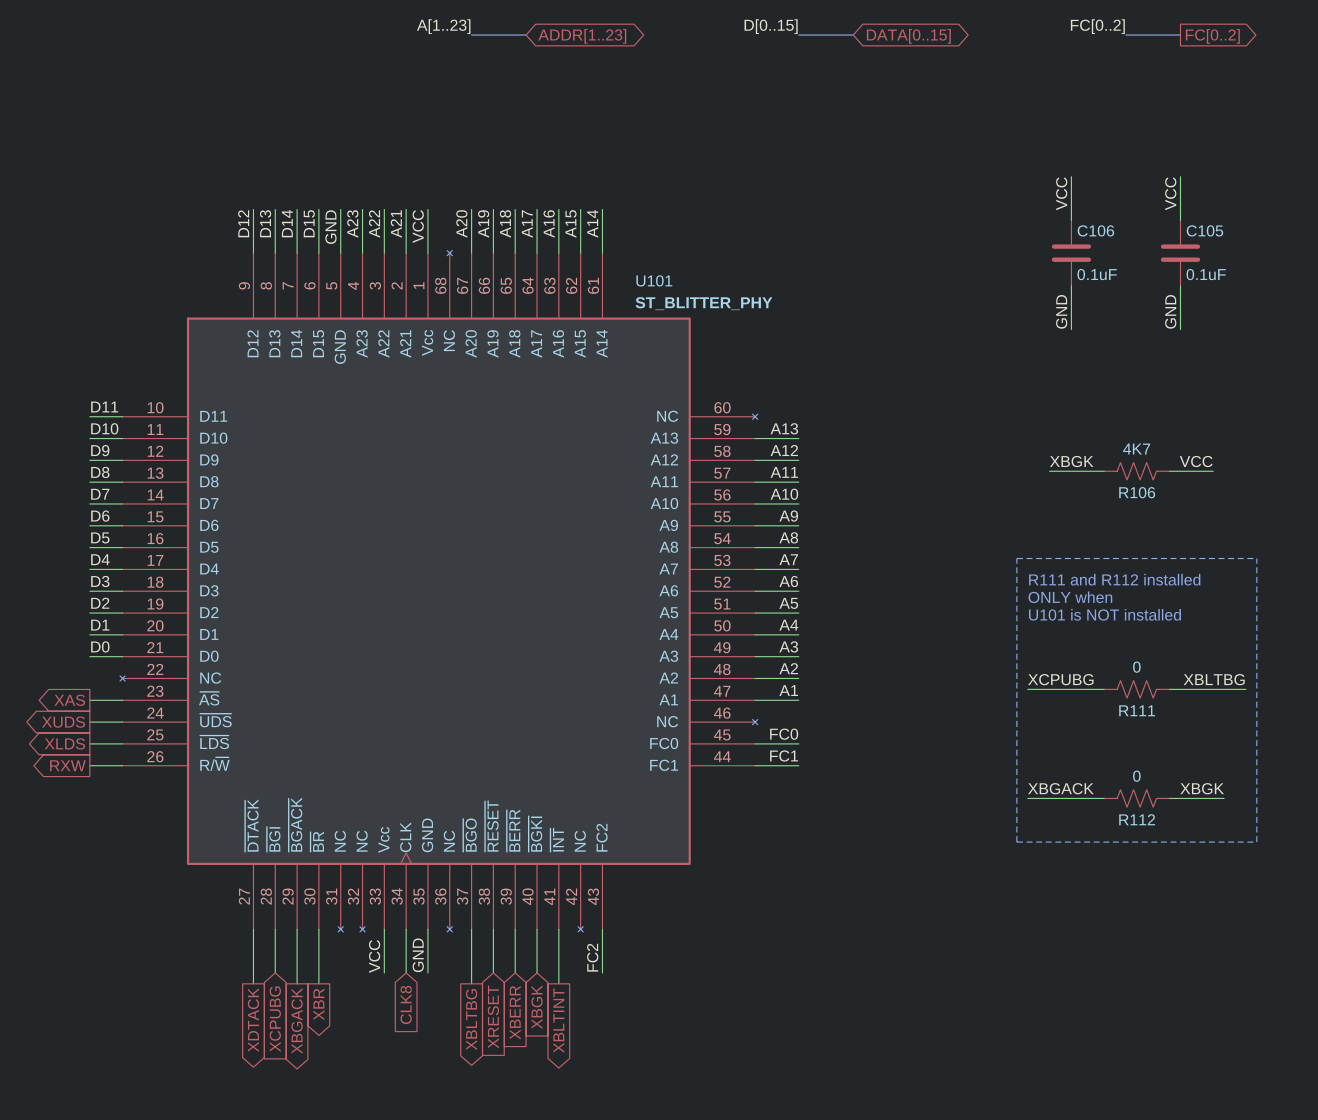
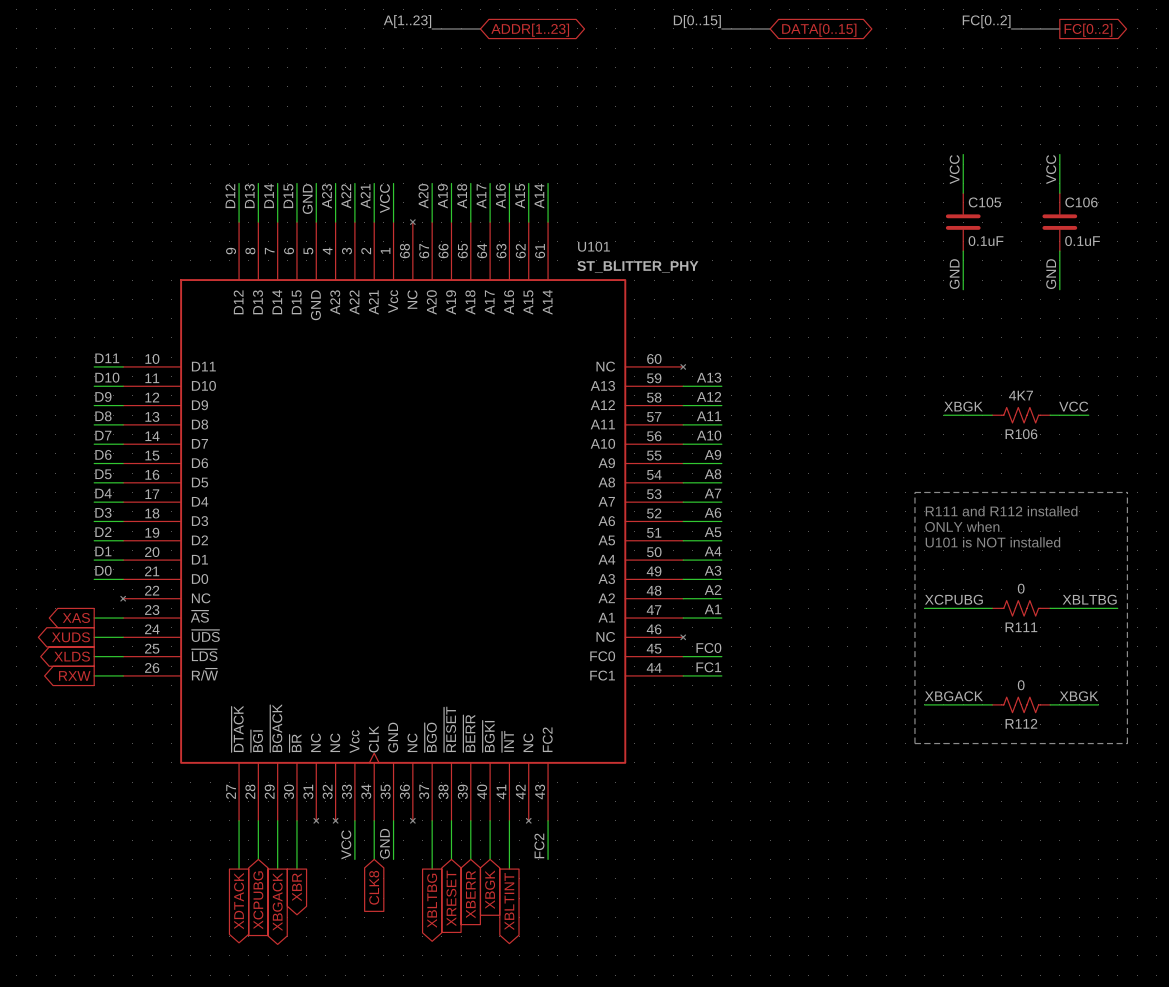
C106 name: C106 (1095, 230) -> C105 (984, 202)
C105 name: C105 (1204, 230) -> C106 (1081, 202)

